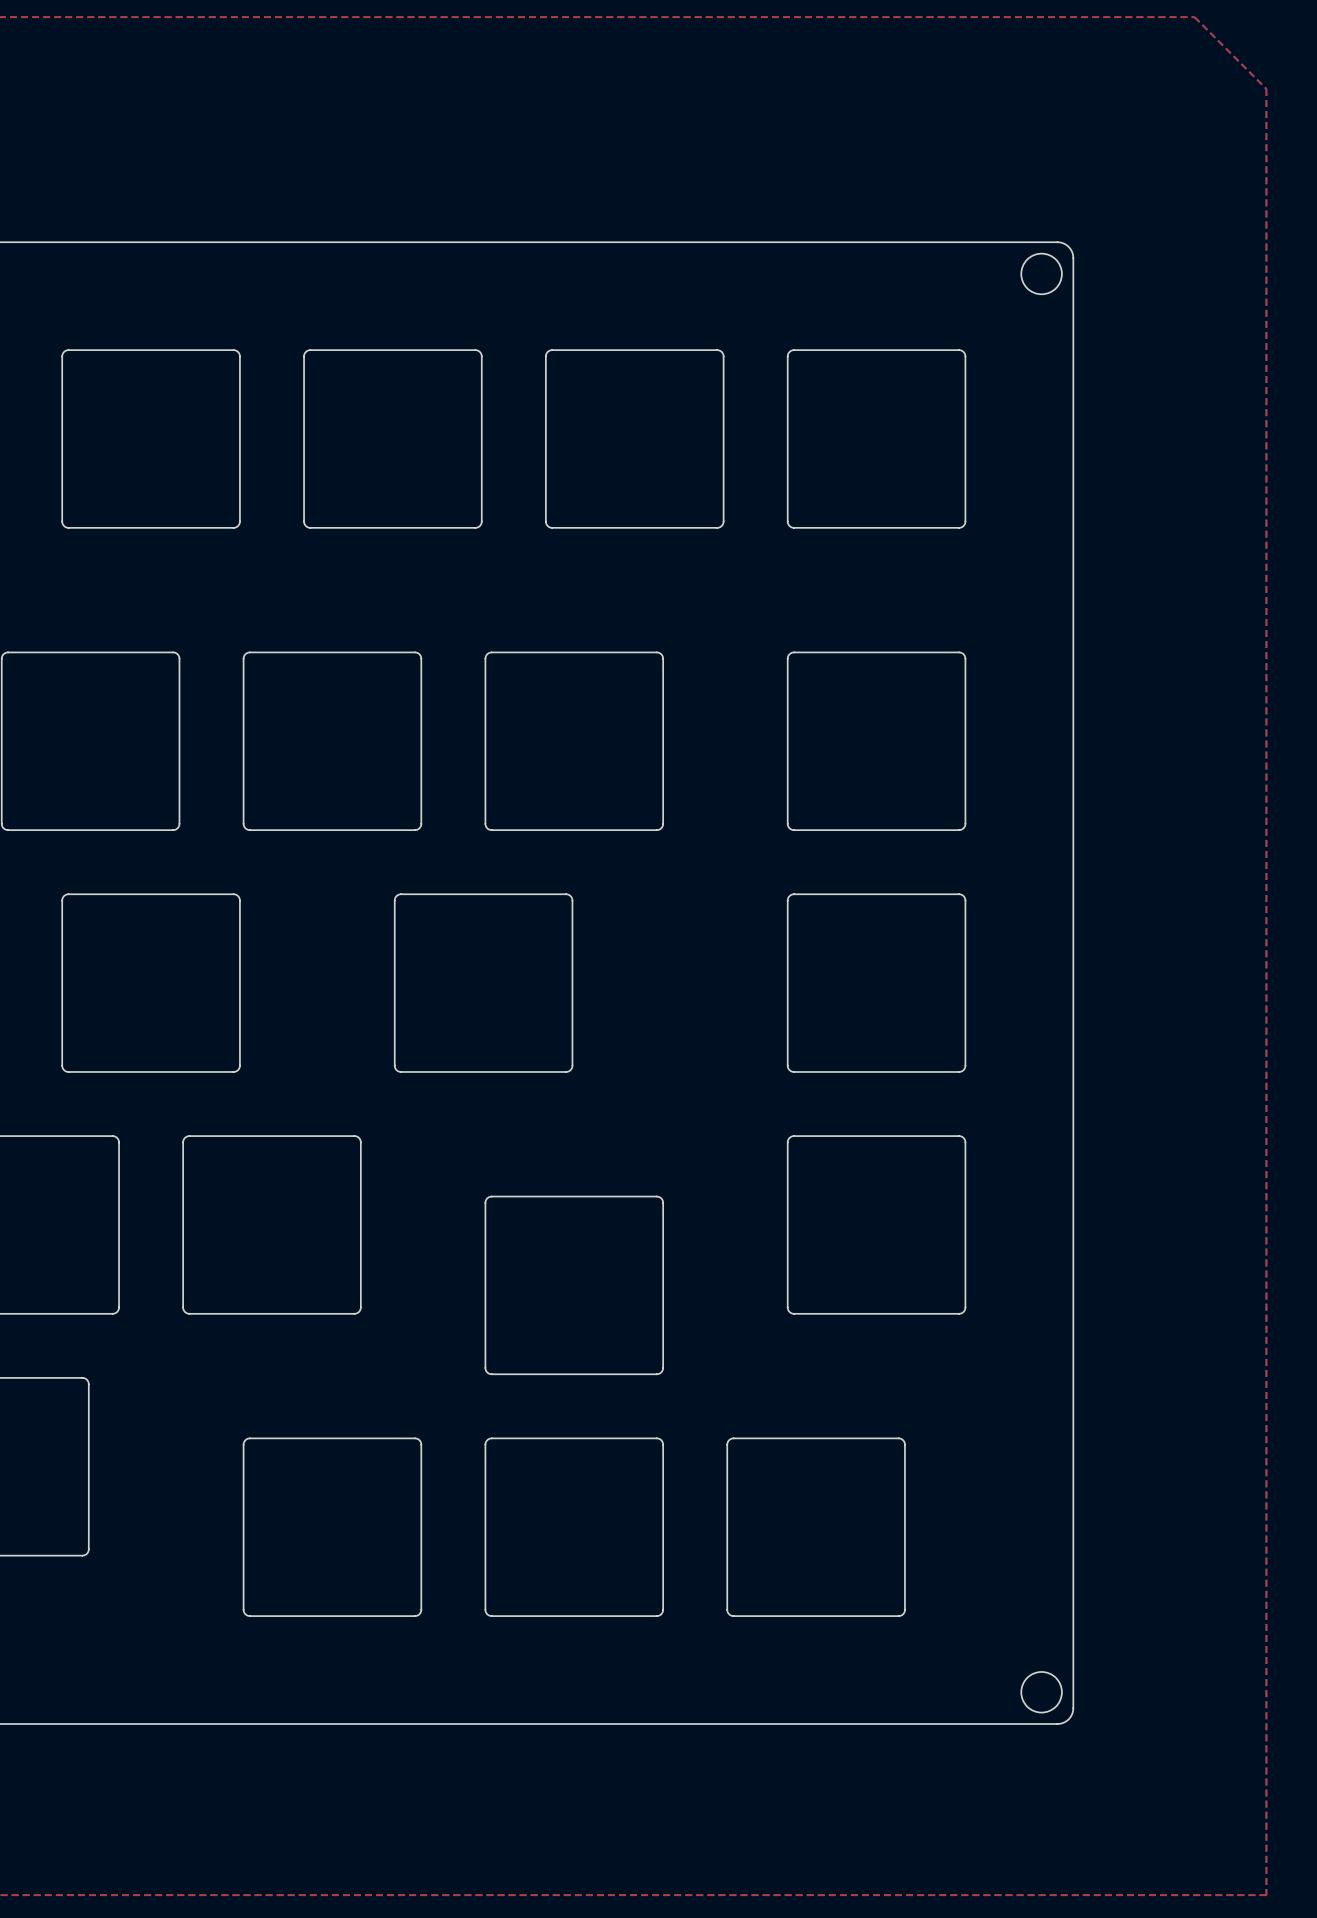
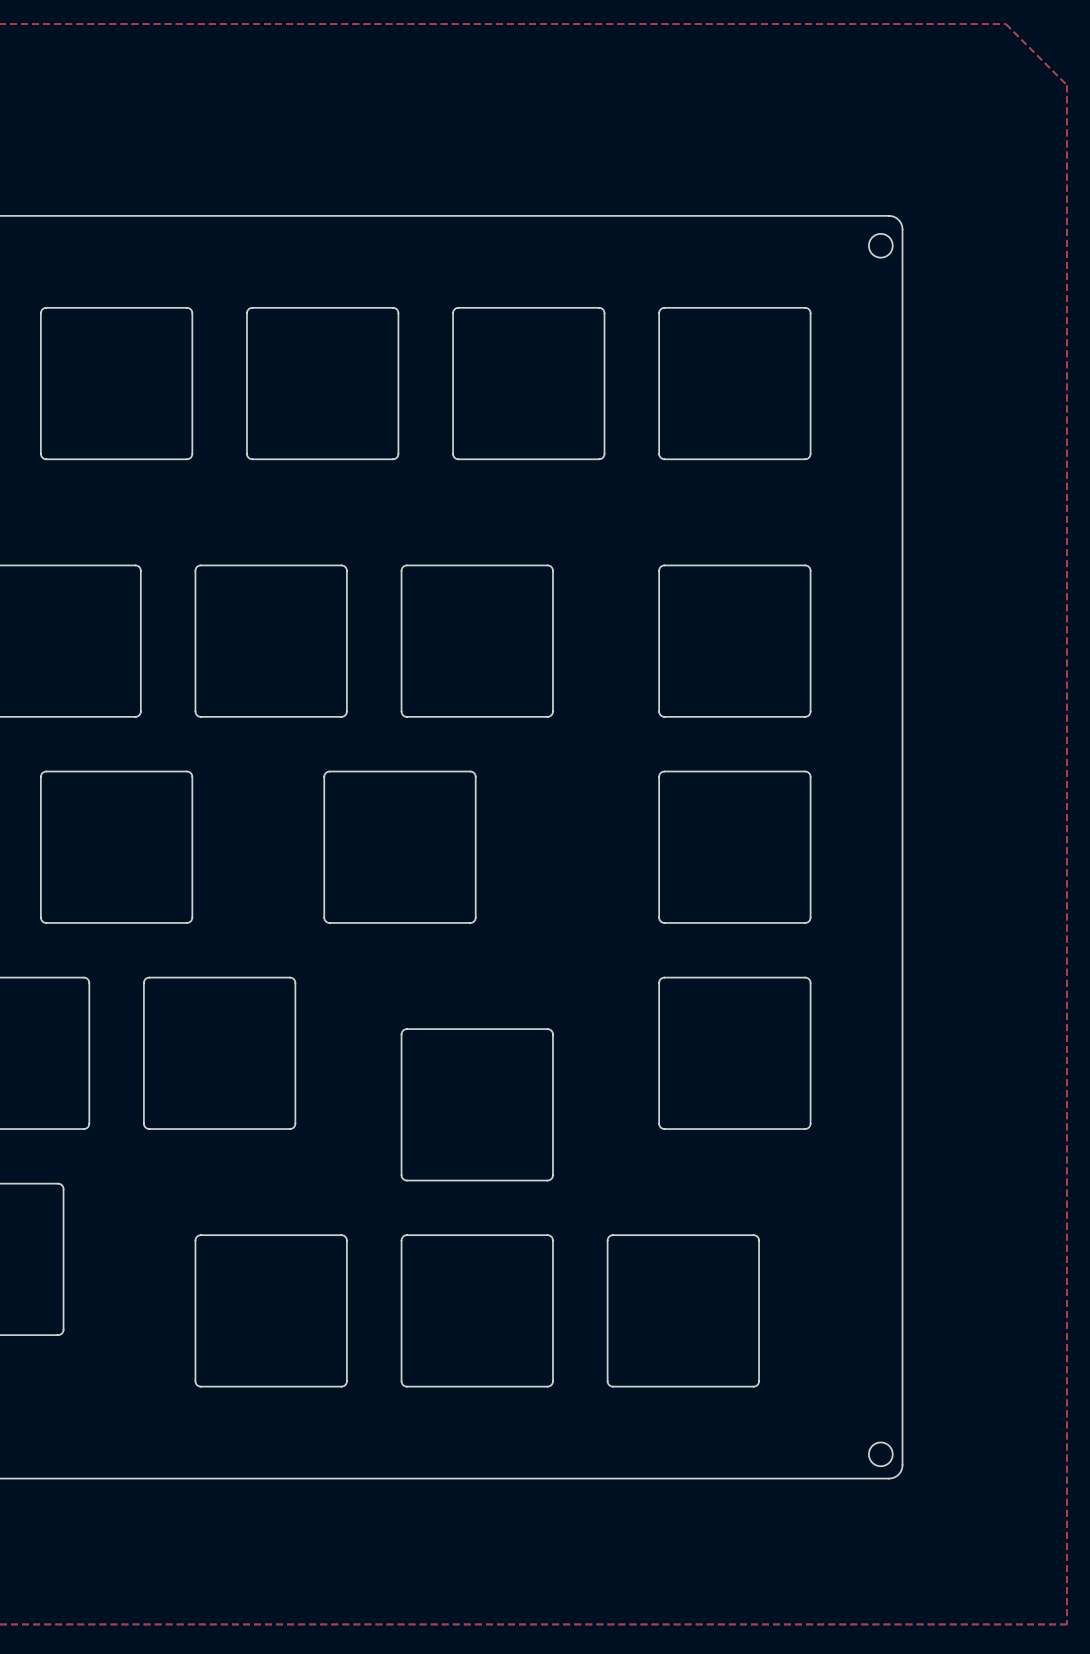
round board edge size: [1020, 253, 1063, 295] -> [868, 233, 894, 259]
round board edge size: [1020, 1671, 1063, 1714] -> [868, 1441, 894, 1467]

